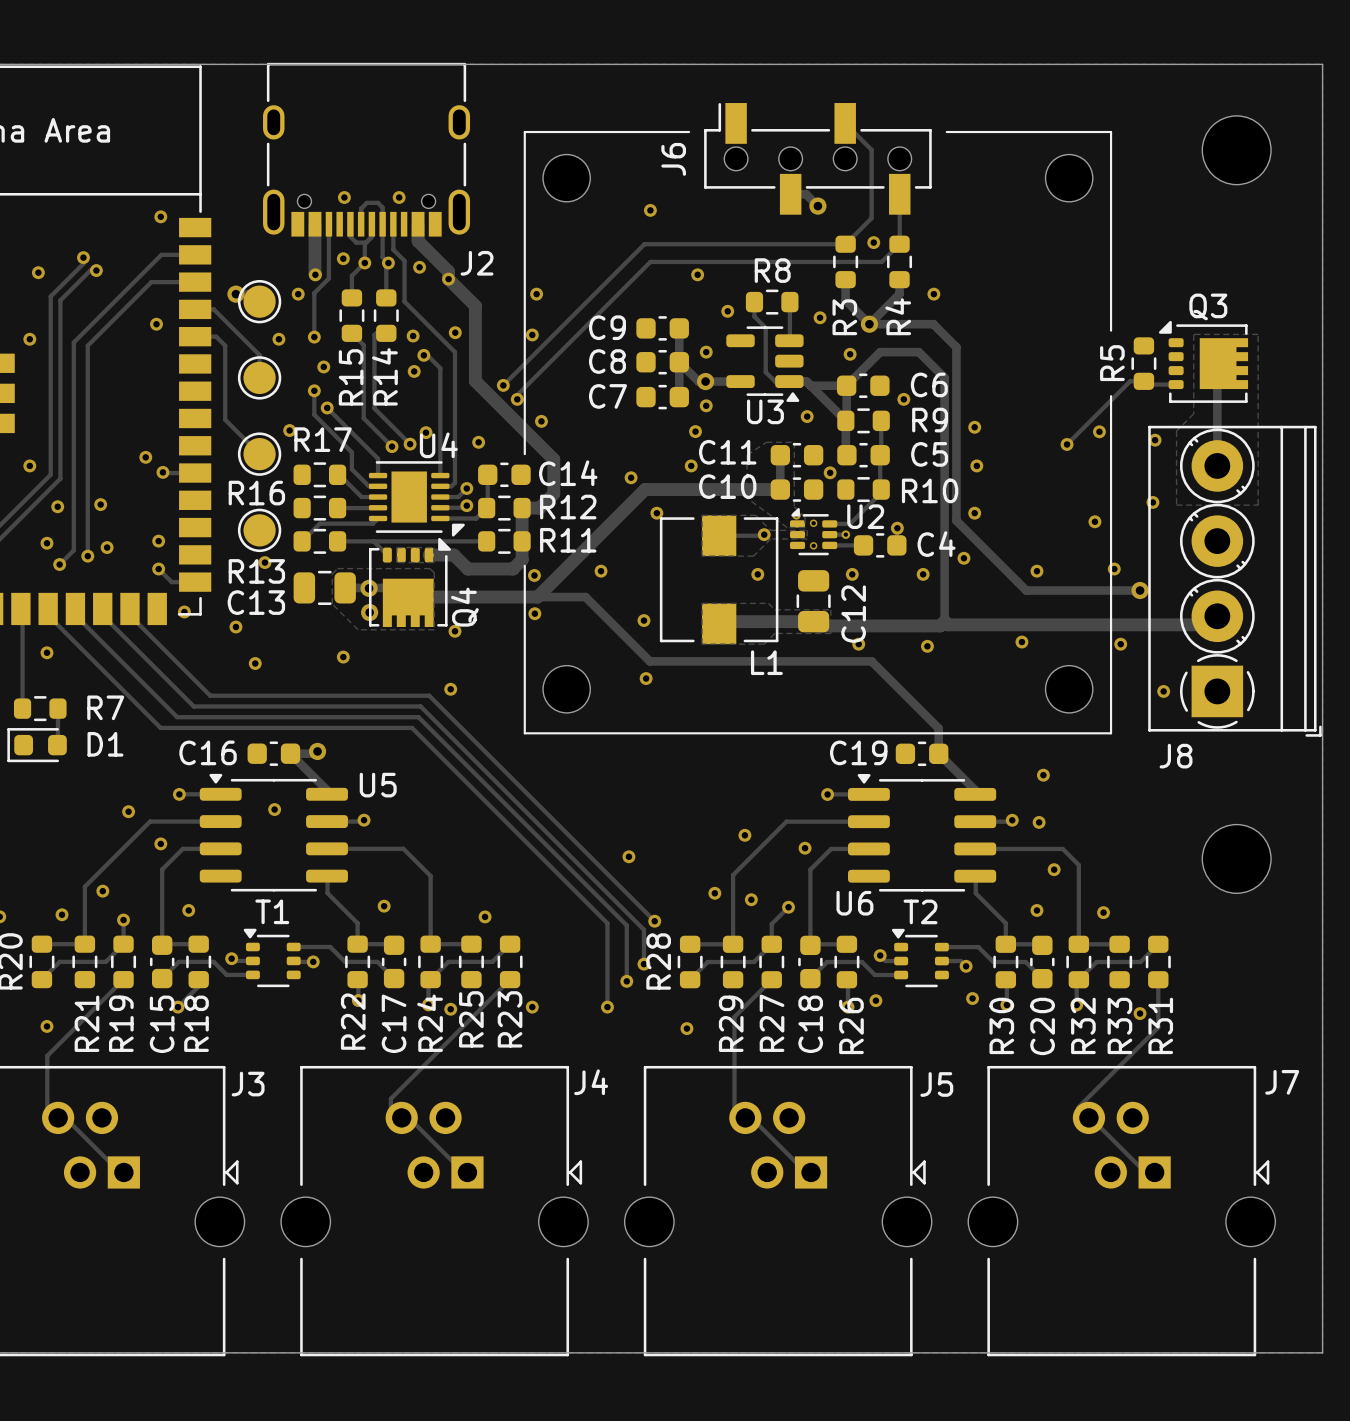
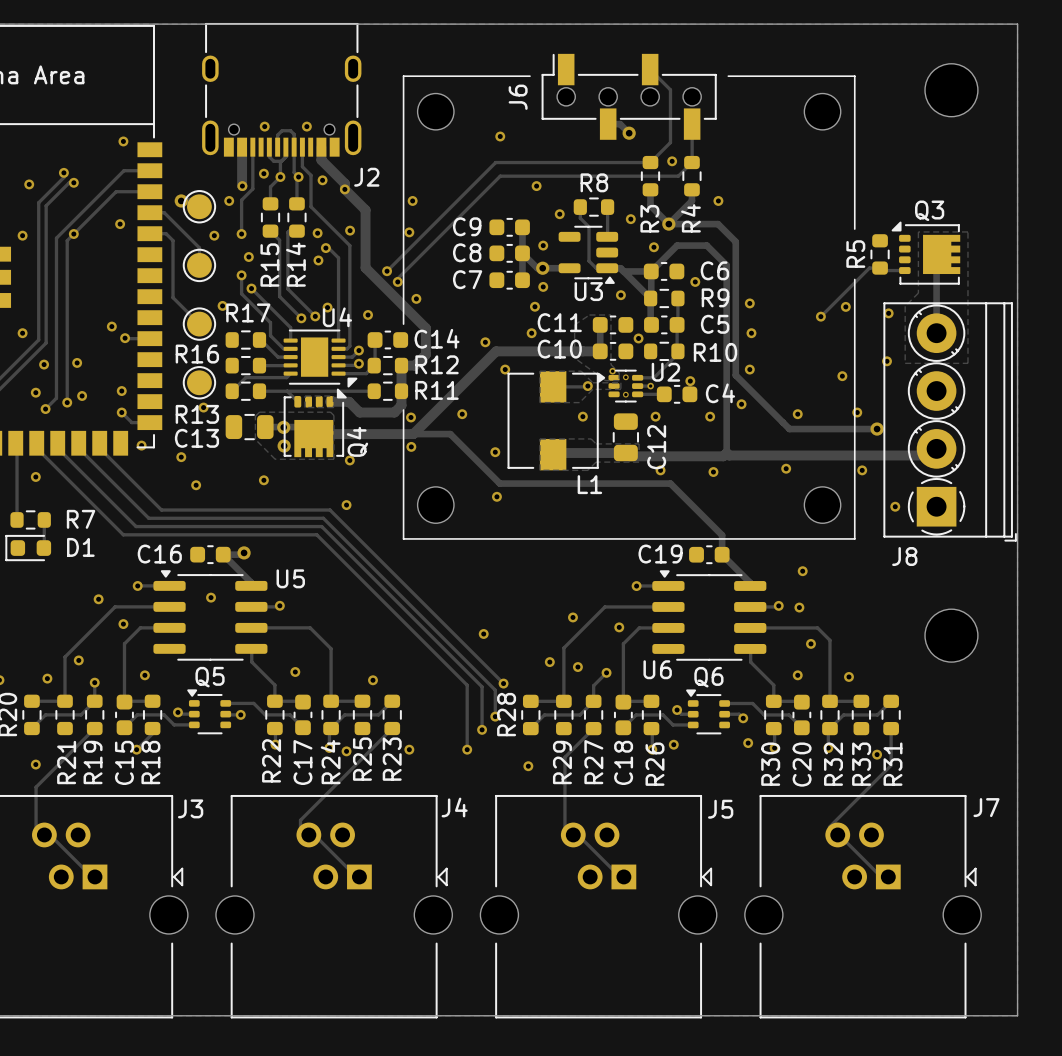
via: none -> (73, 234)
U2 footprint: [790, 508, 838, 556] -> [597, 369, 644, 403]
T1 name: T1 (272, 911) -> Q5 (210, 677)
T2 name: T2 (920, 911) -> Q6 (708, 677)

